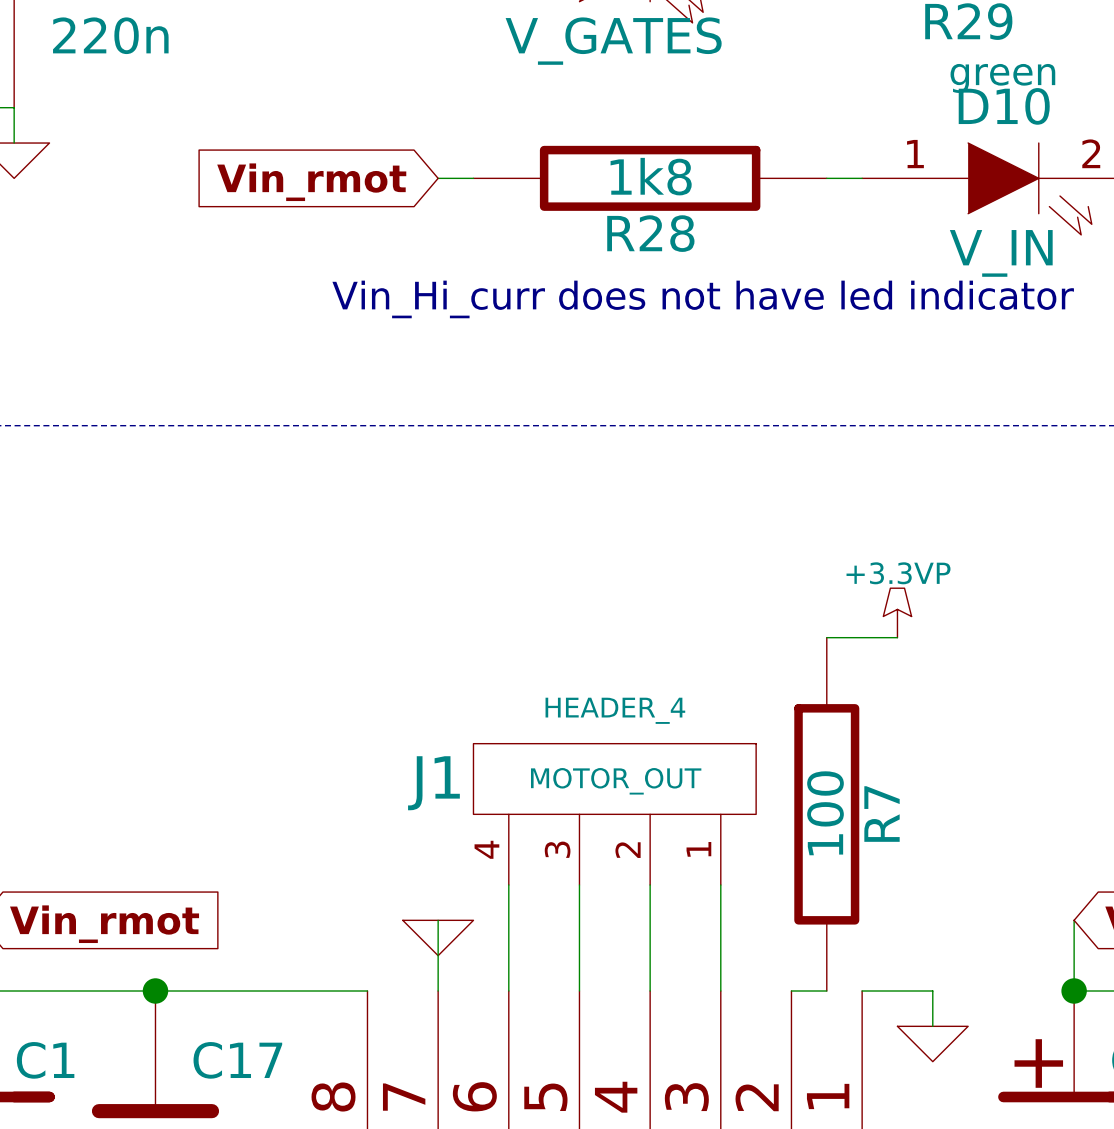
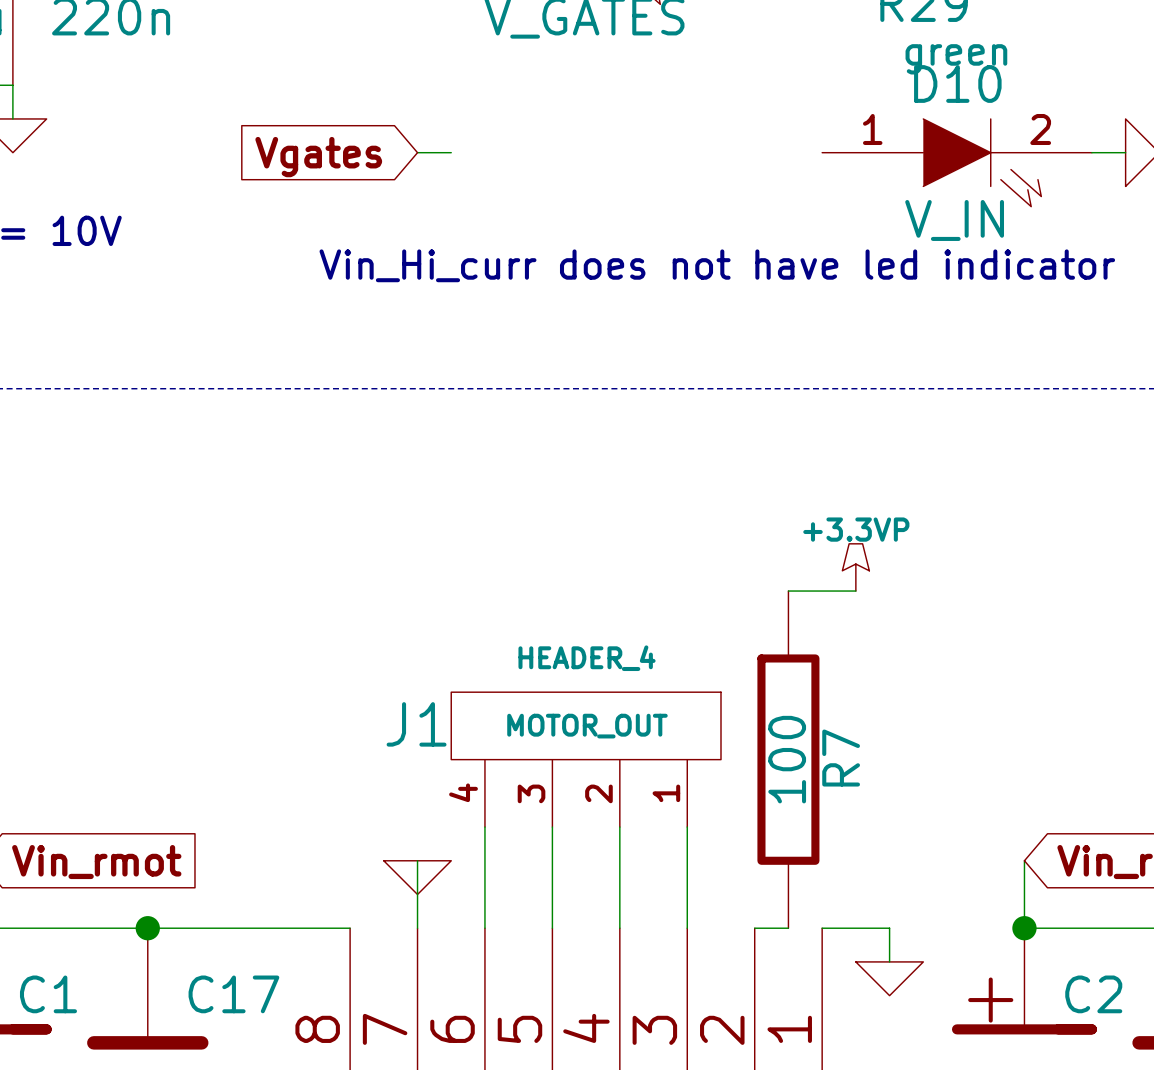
R28: 1k8 (650, 178) -> none
wire: (826, 178) (862, 178) -> none
global label: Vin_rmot (311, 182) -> Vgates (318, 157)

